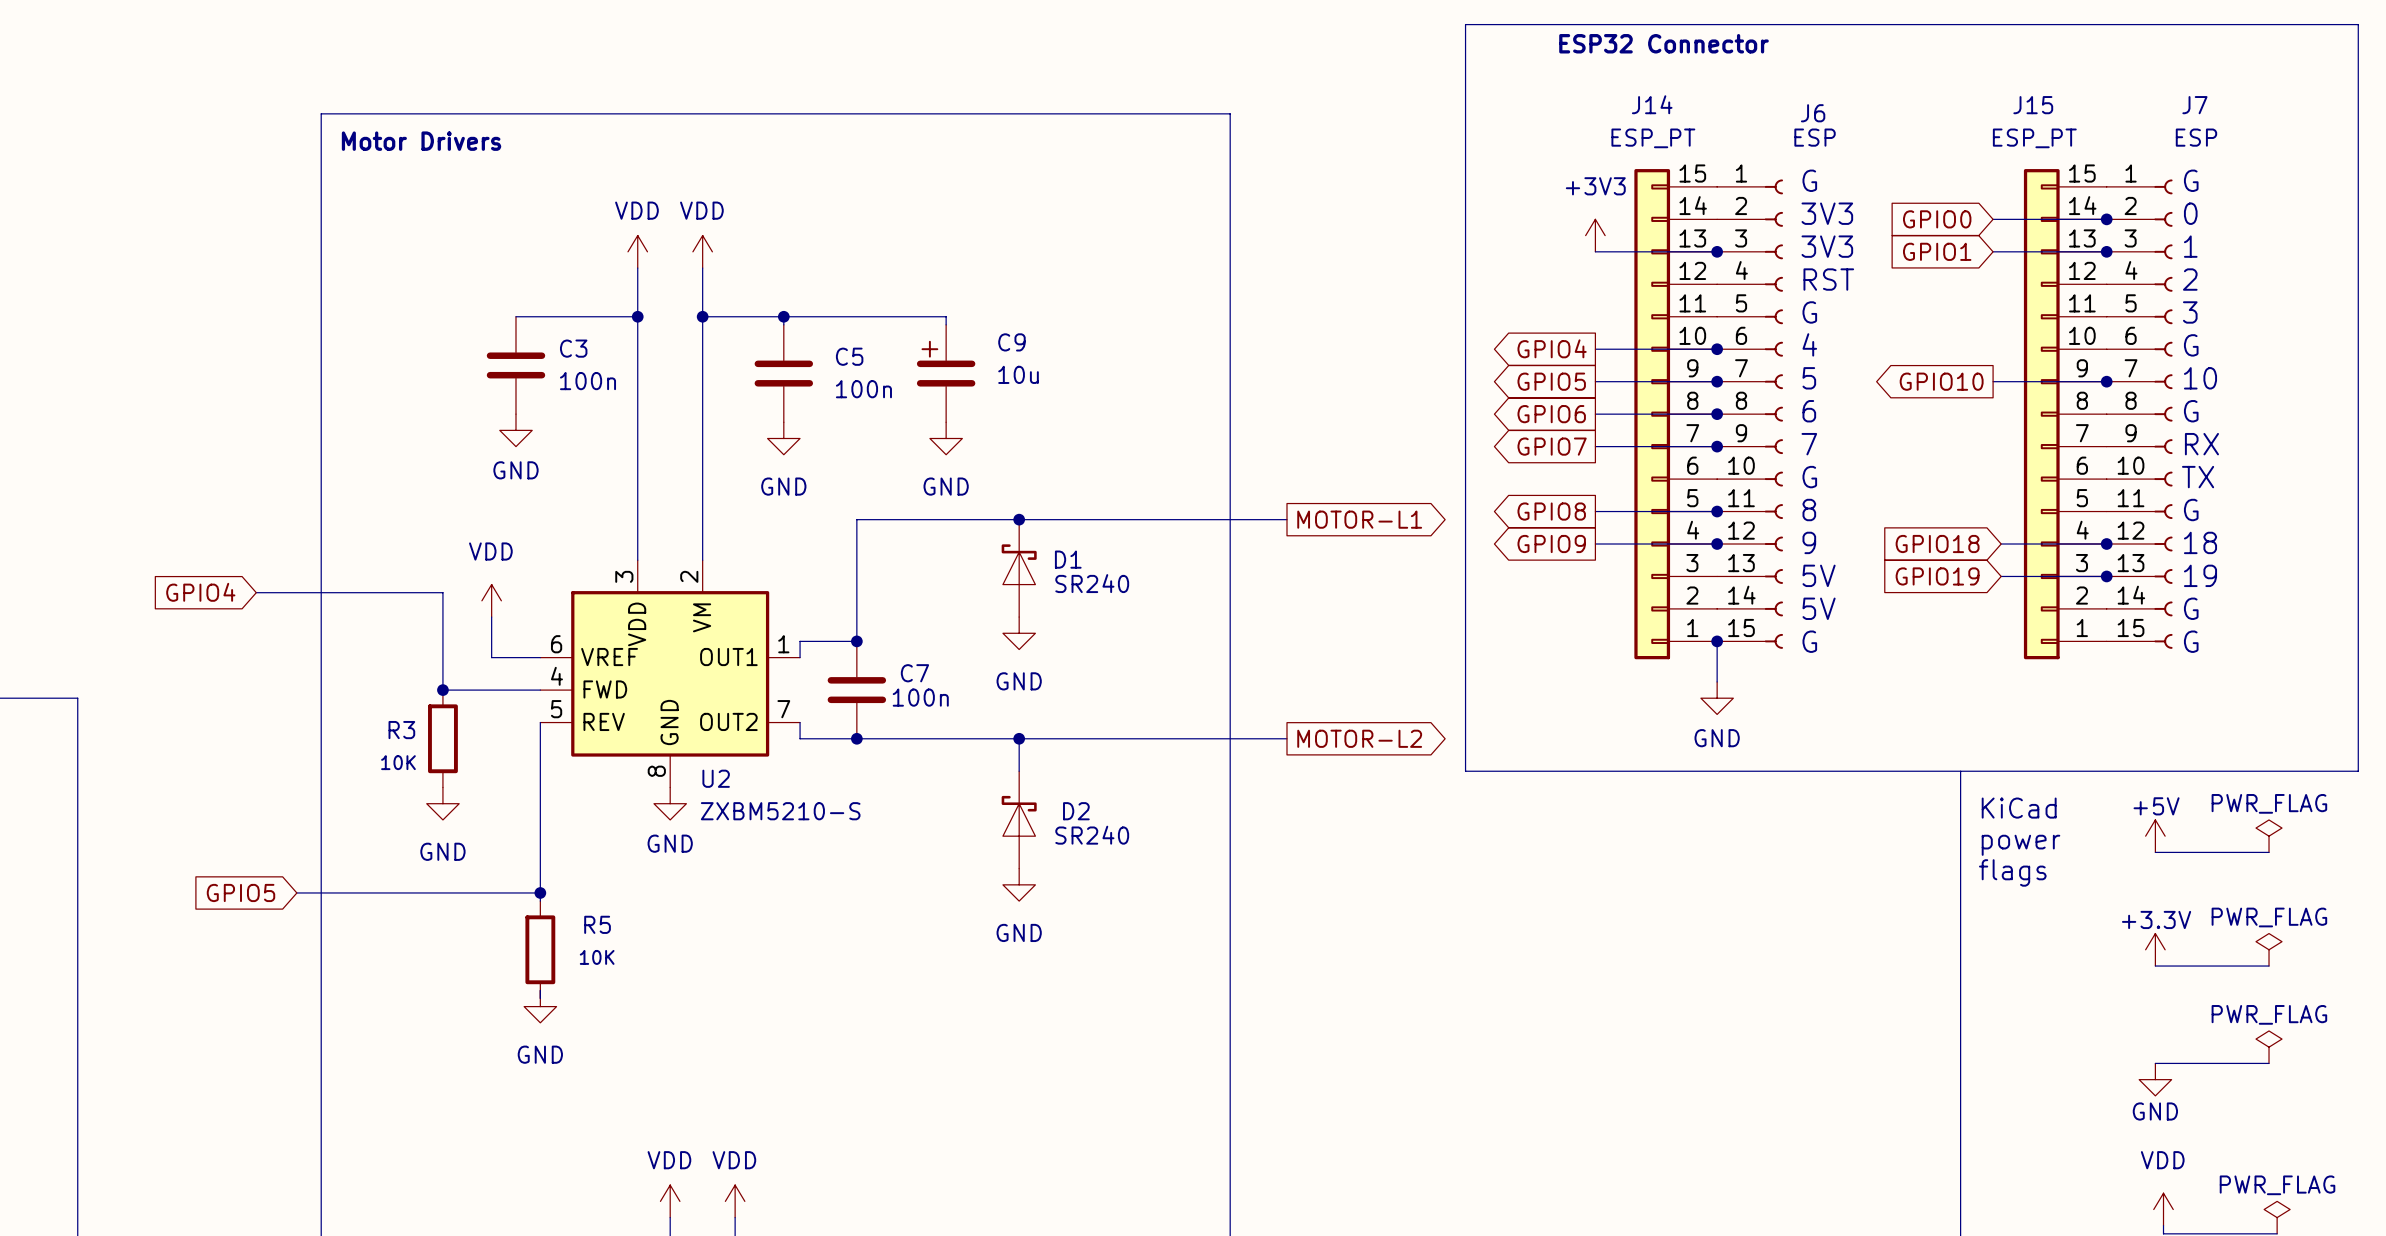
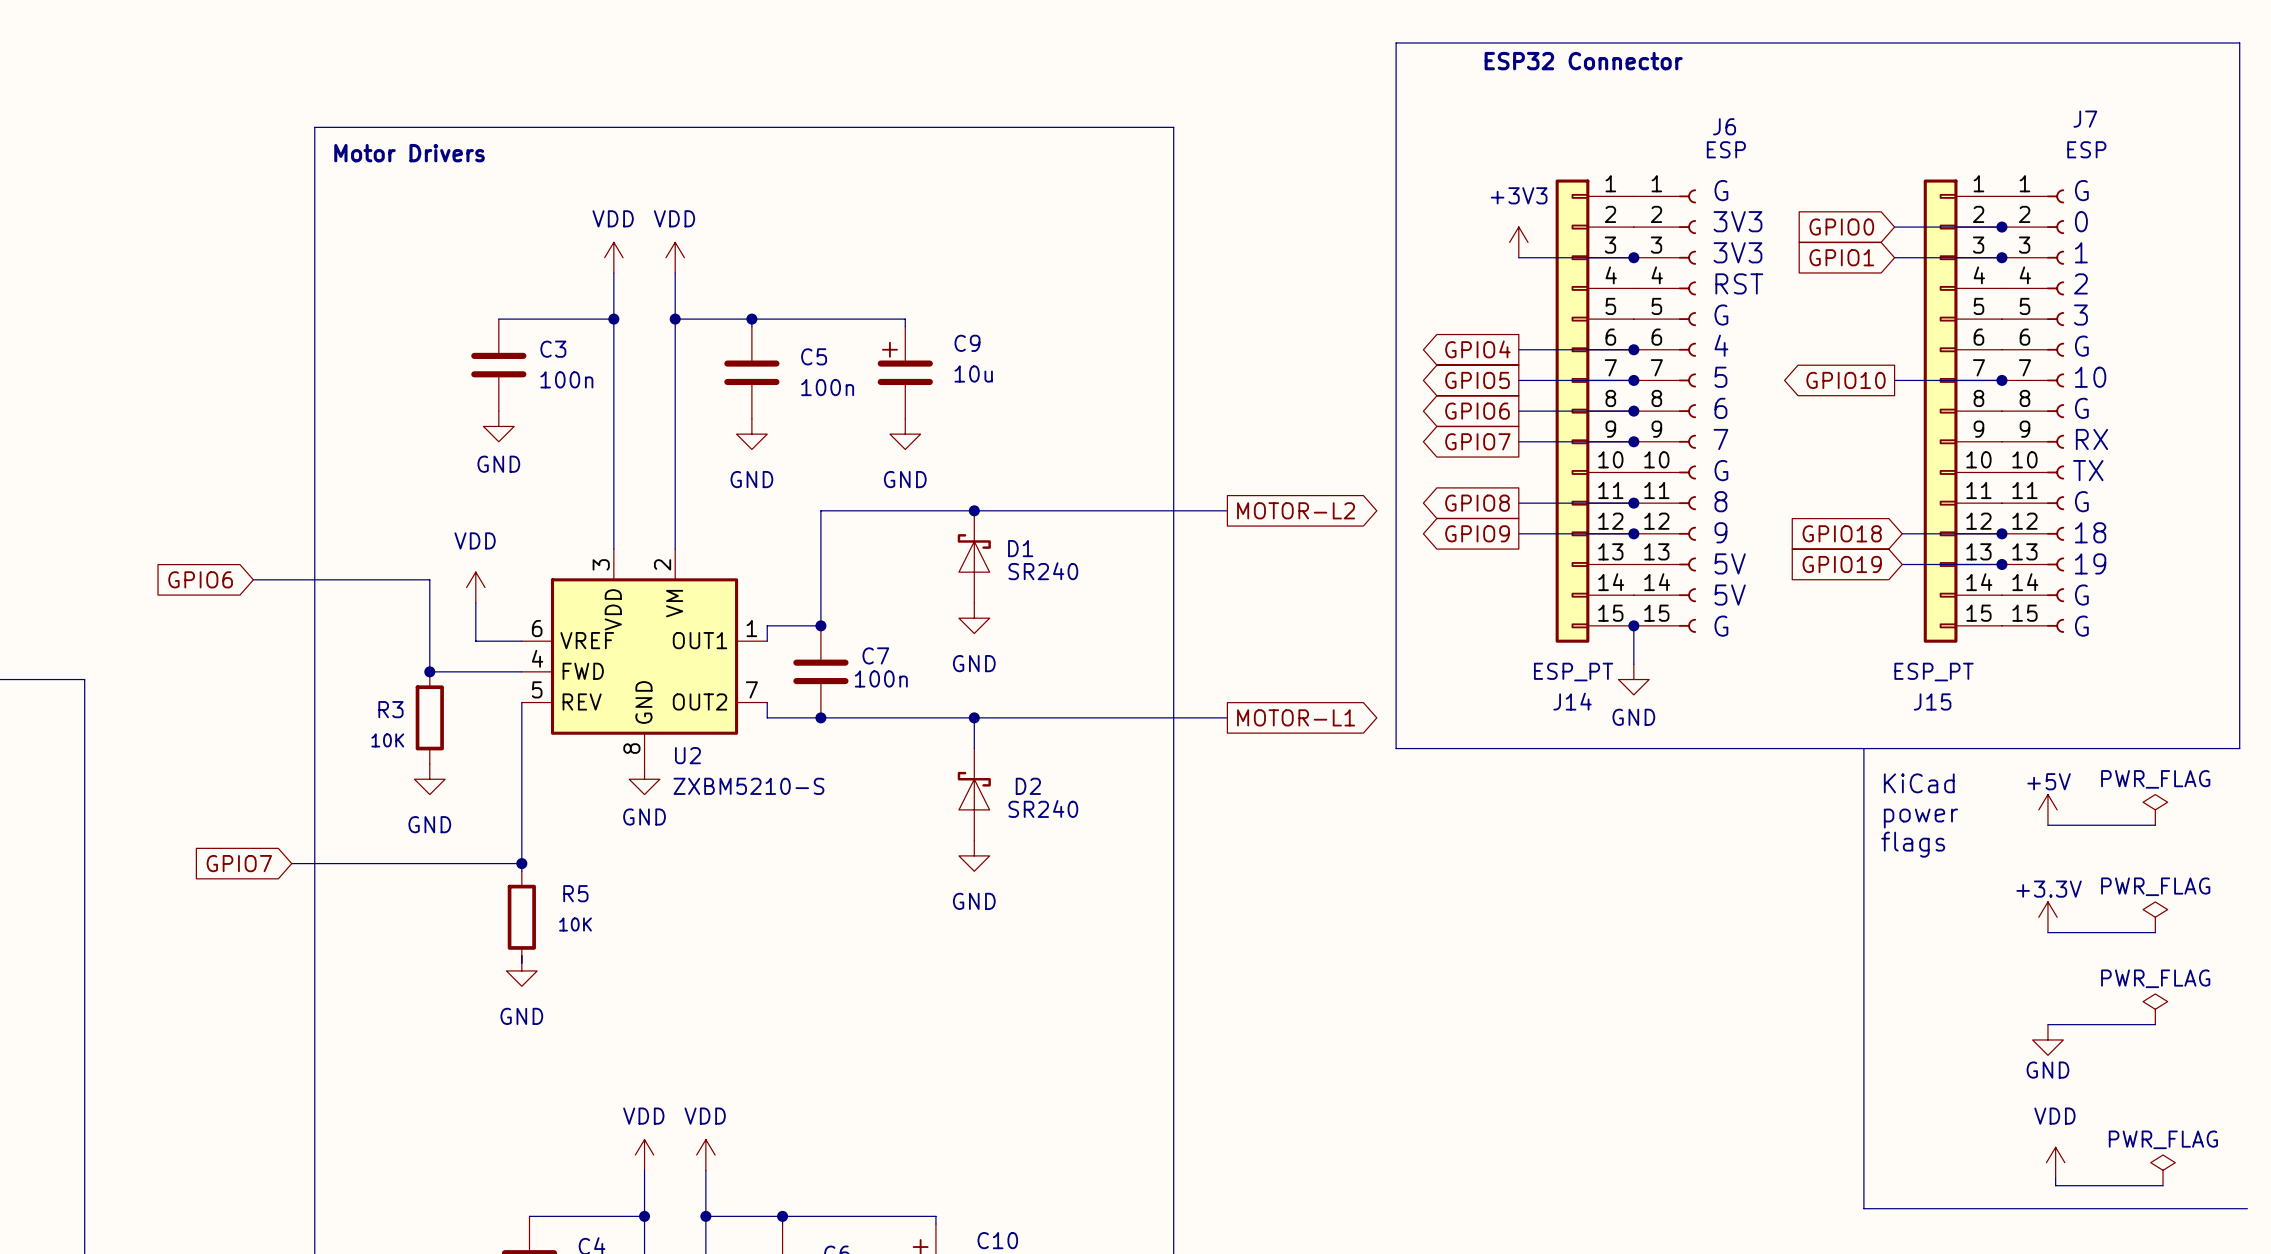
J14 flip: as is (1652, 414) -> up-down (1572, 411)
J15 flip: as is (2041, 414) -> up-down (1940, 411)
global label: MOTOR-L1 (1359, 519) -> MOTOR-L2 (1296, 510)
global label: GPIO4 (200, 592) -> GPIO6 (200, 579)
global label: MOTOR-L2 (1359, 738) -> MOTOR-L1 (1296, 717)
global label: GPIO5 (241, 892) -> GPIO7 (239, 863)

